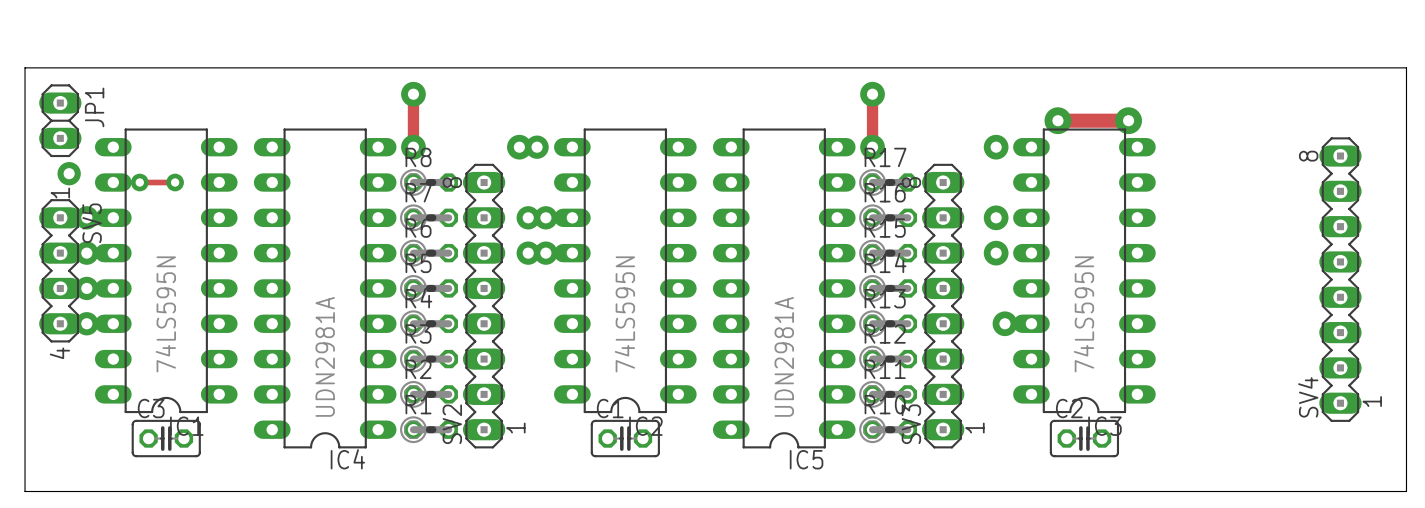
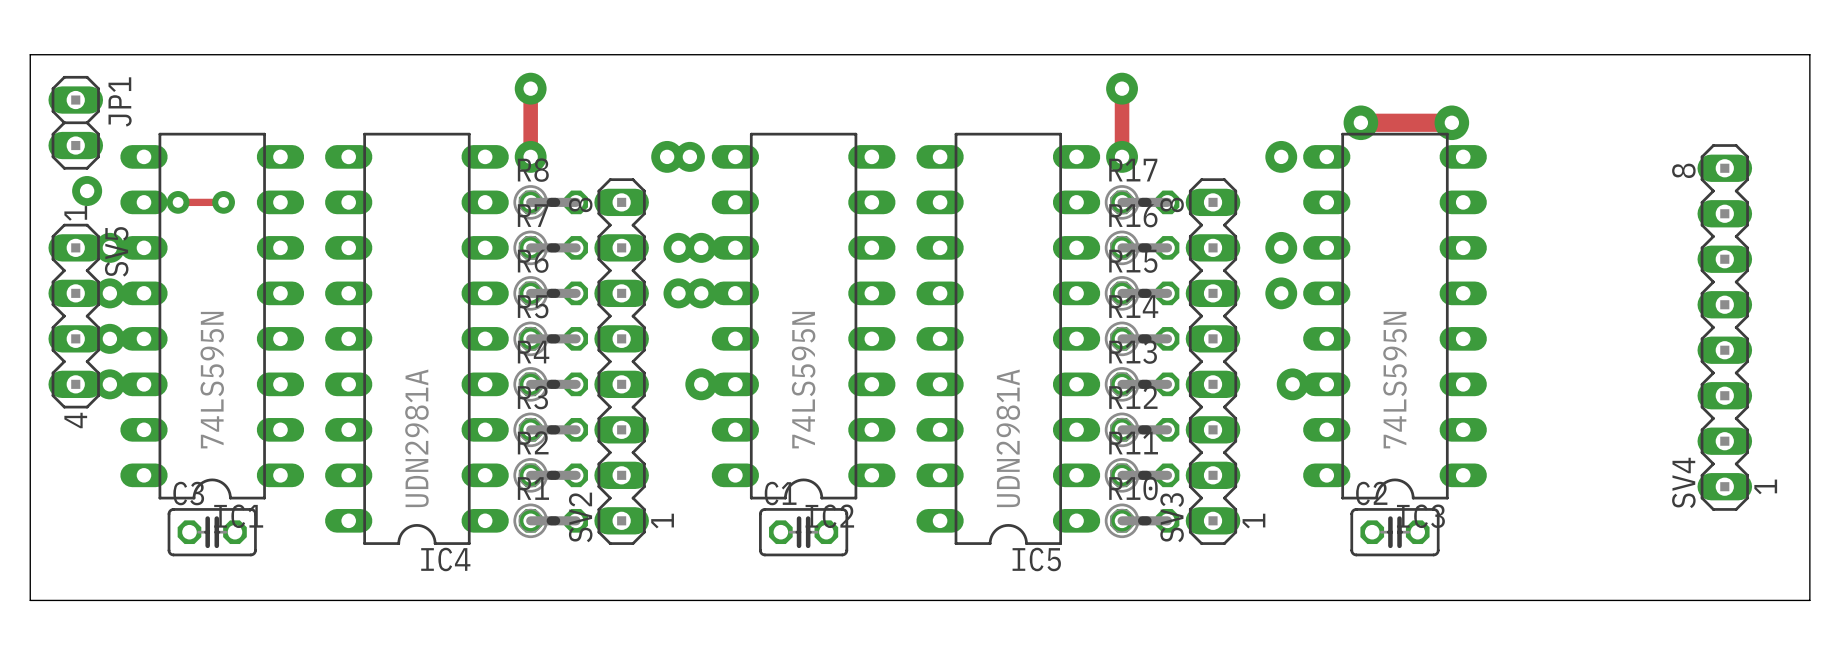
via: none -> (701, 384)

